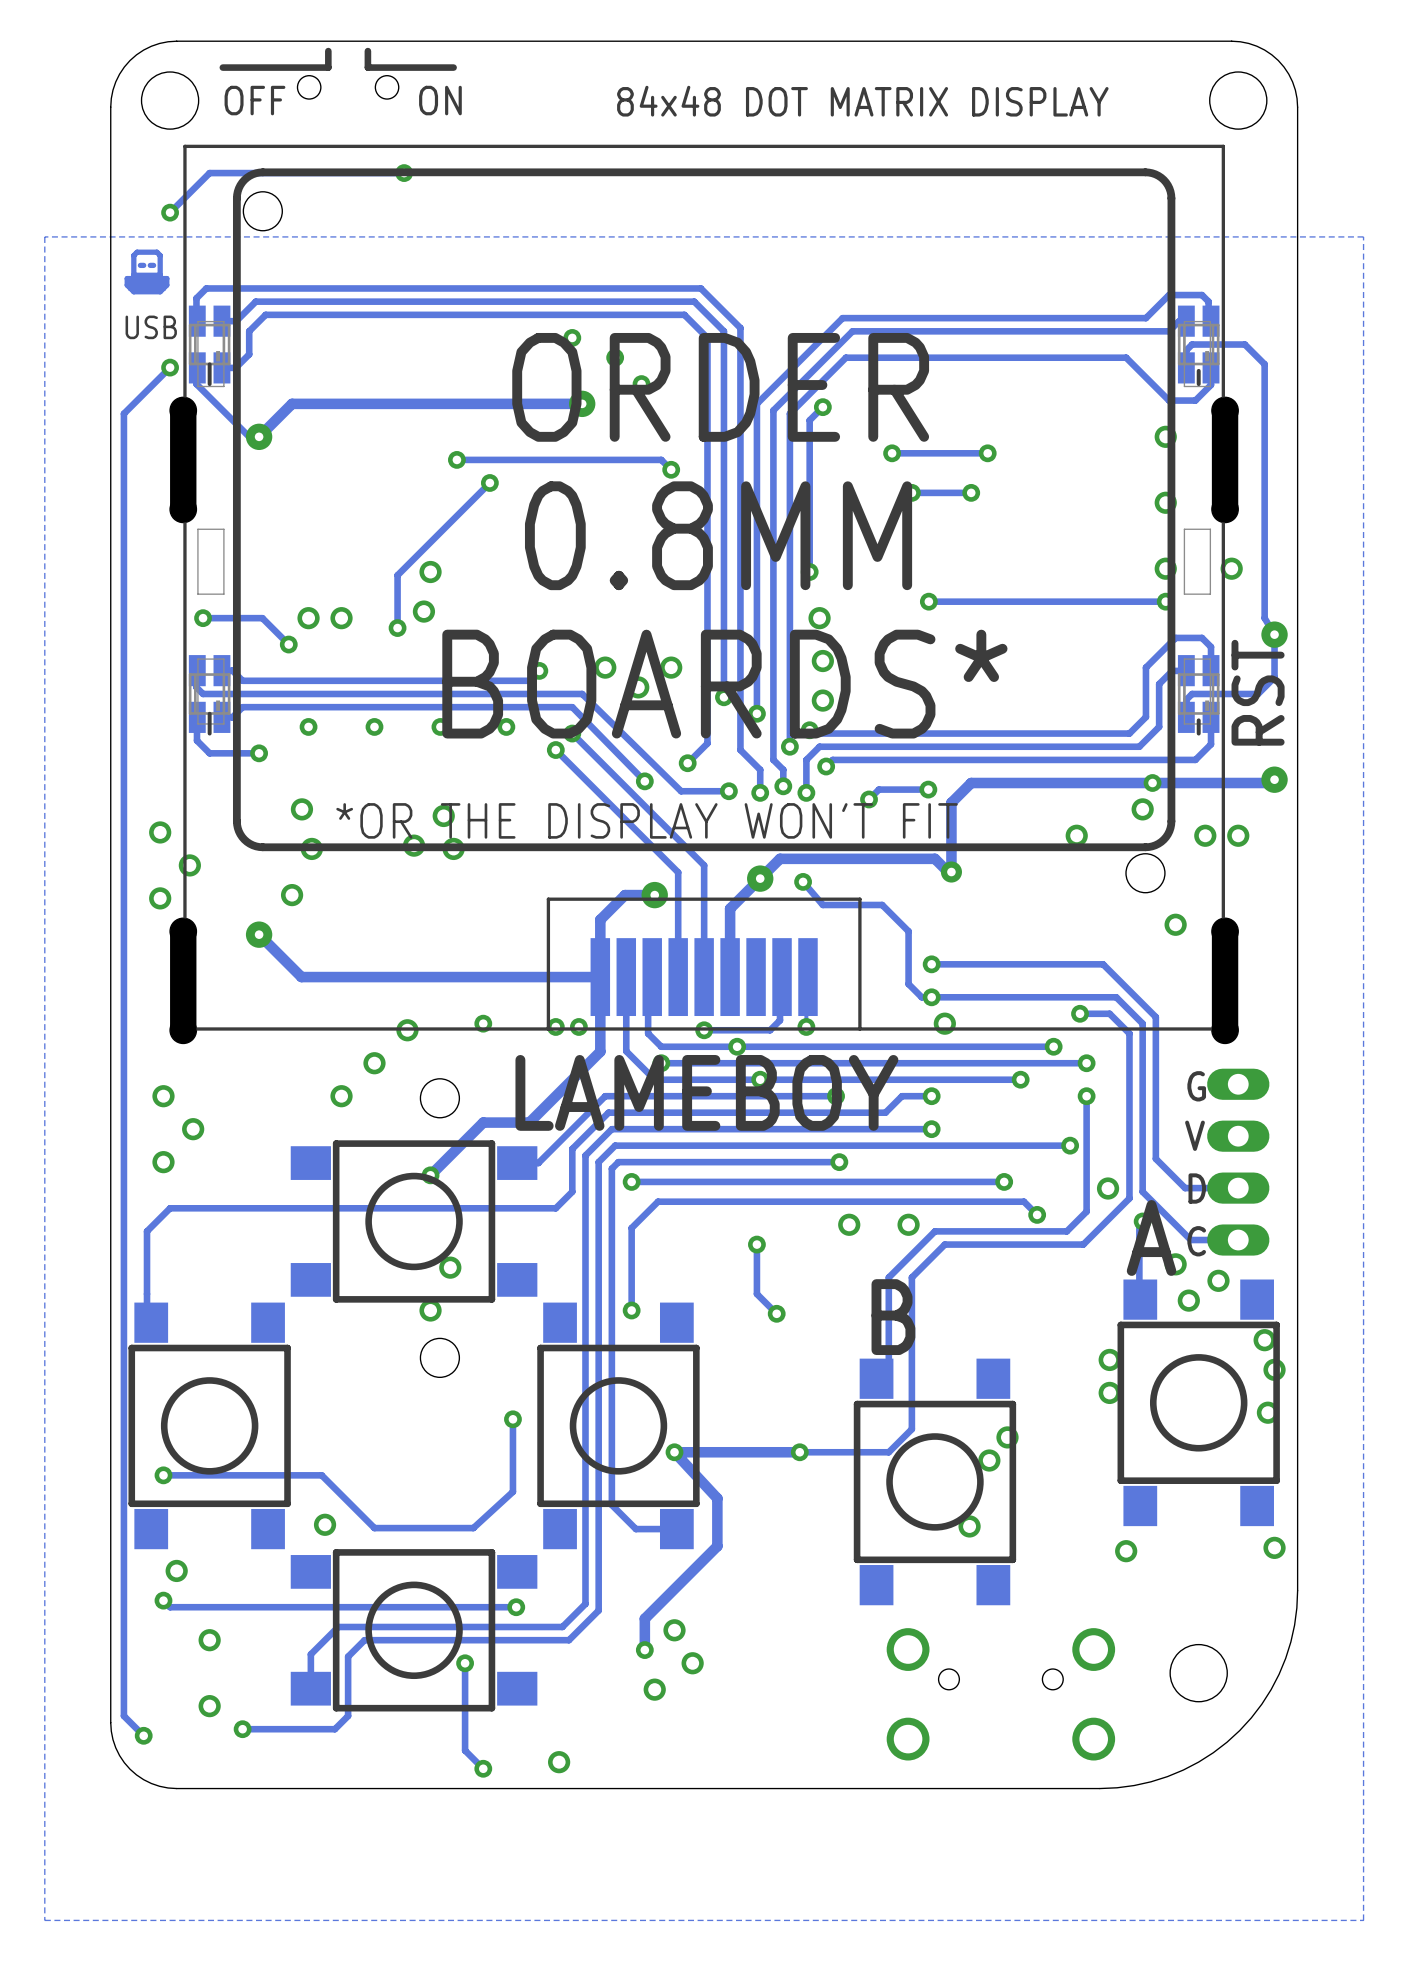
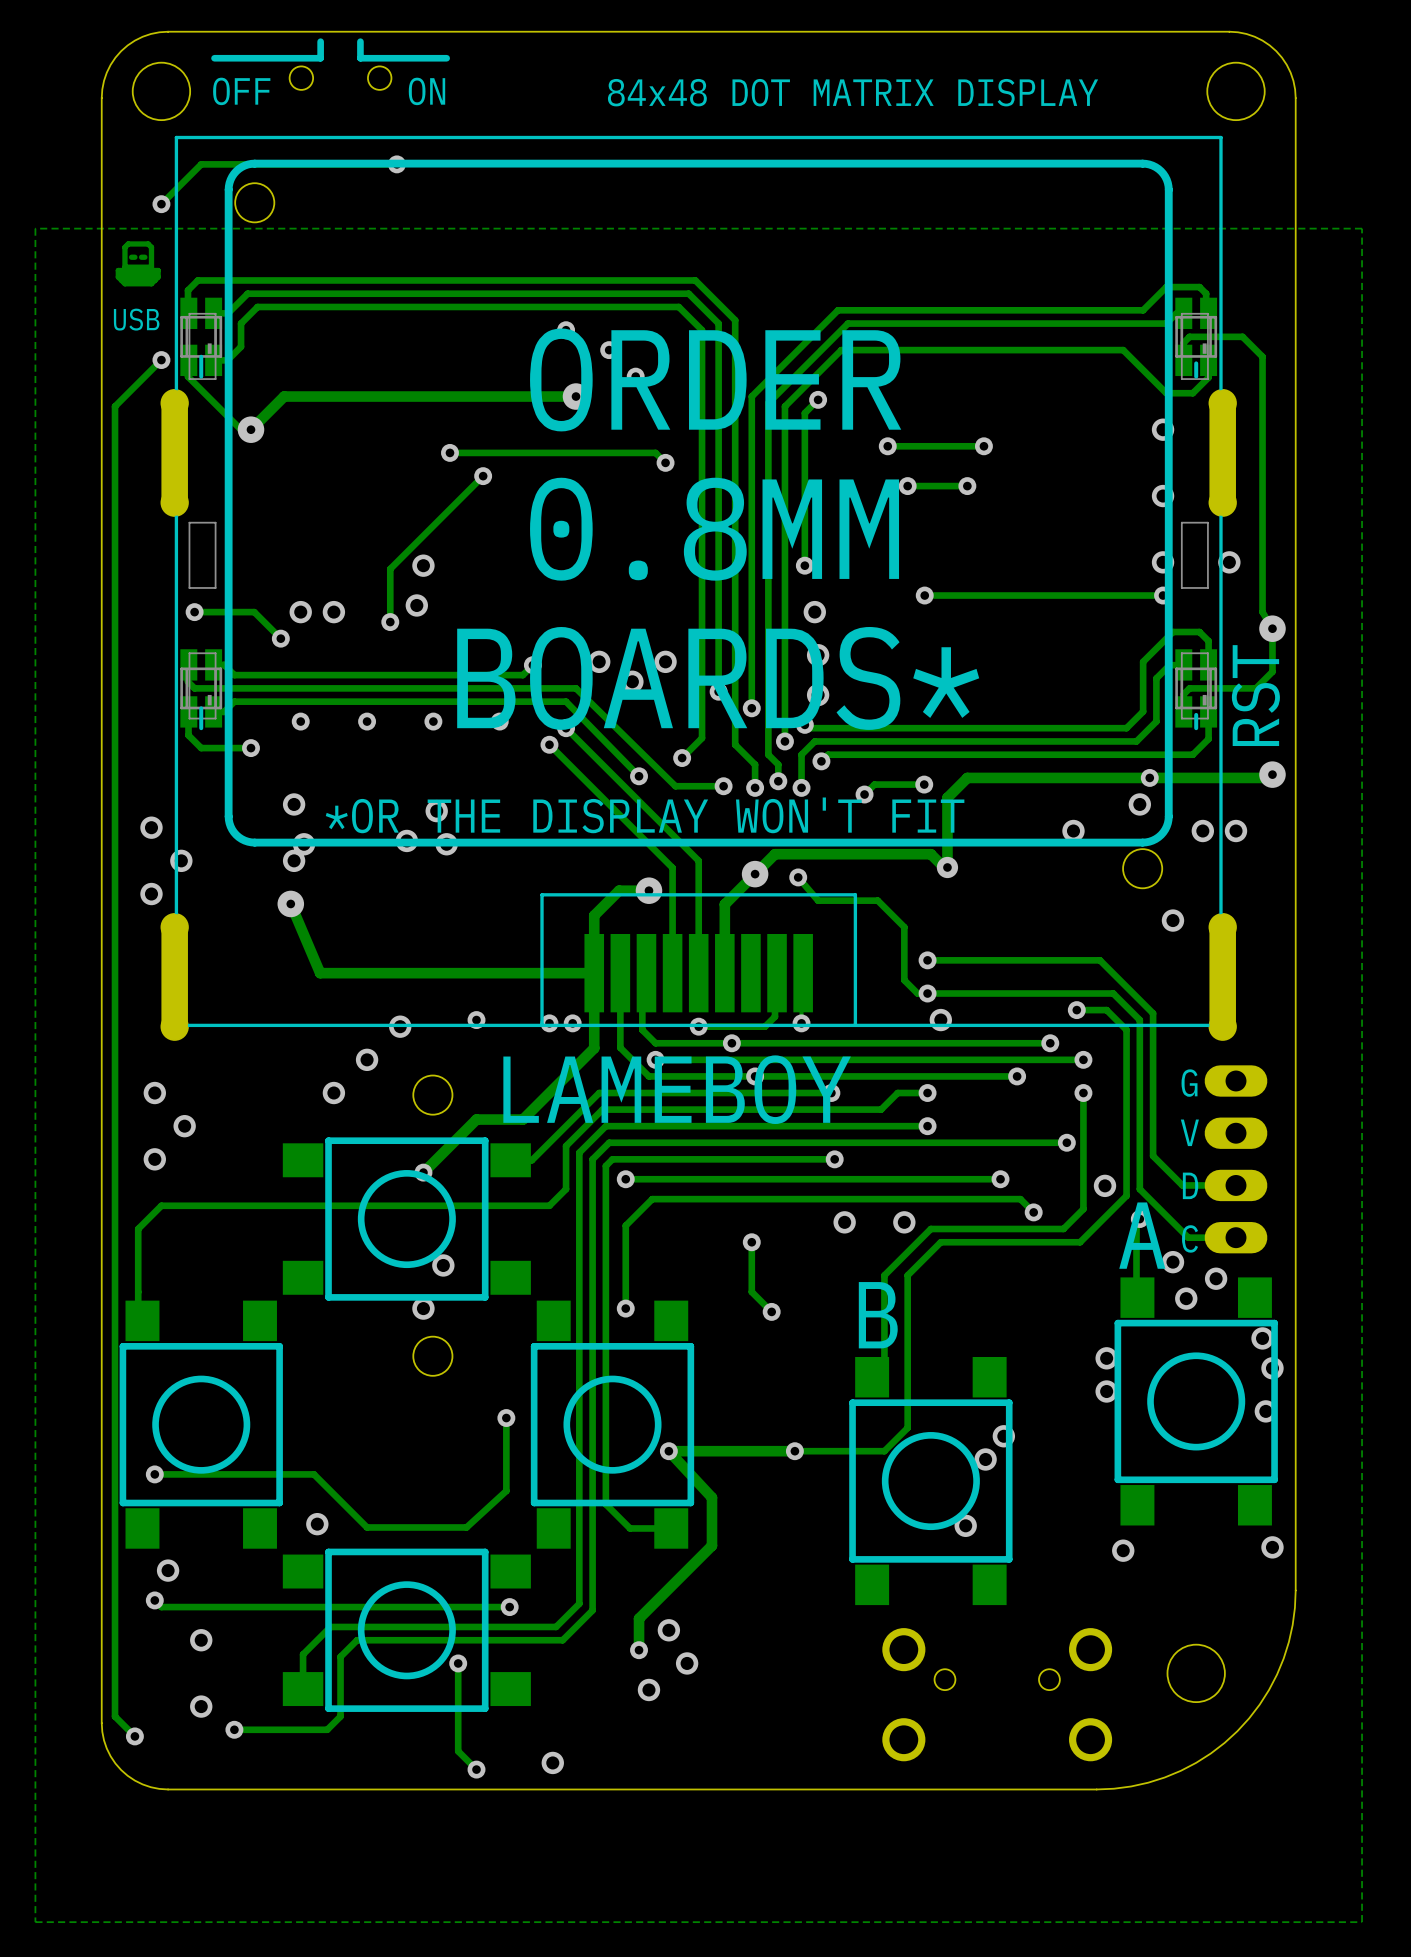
via position: (292, 895) -> (294, 860)
track: (259, 934) (301, 977) (327, 977) -> (290, 903) (320, 973)
via position: (259, 934) -> (290, 903)

